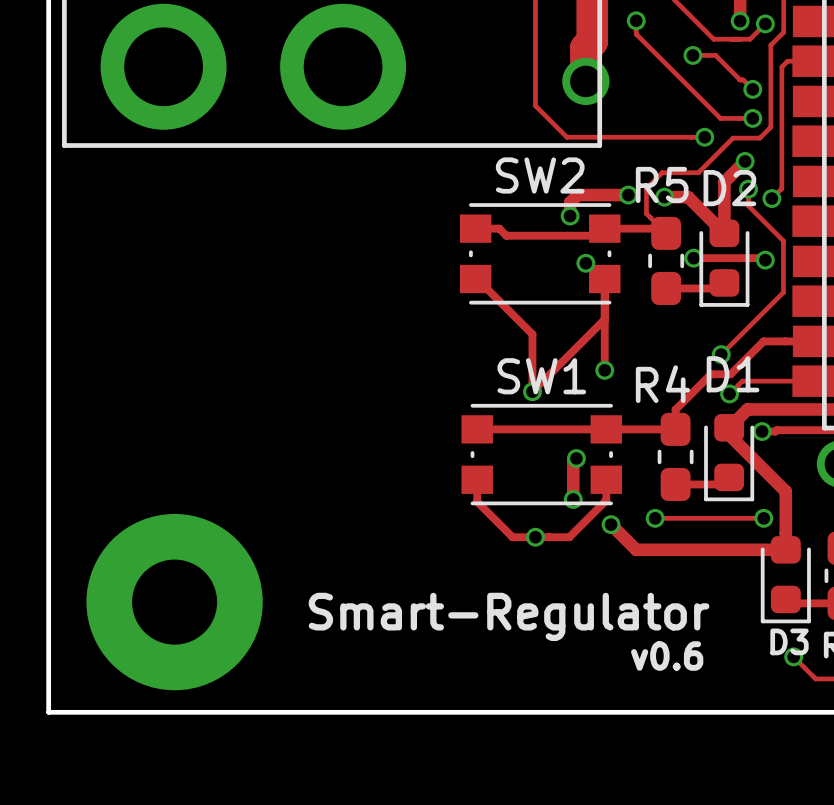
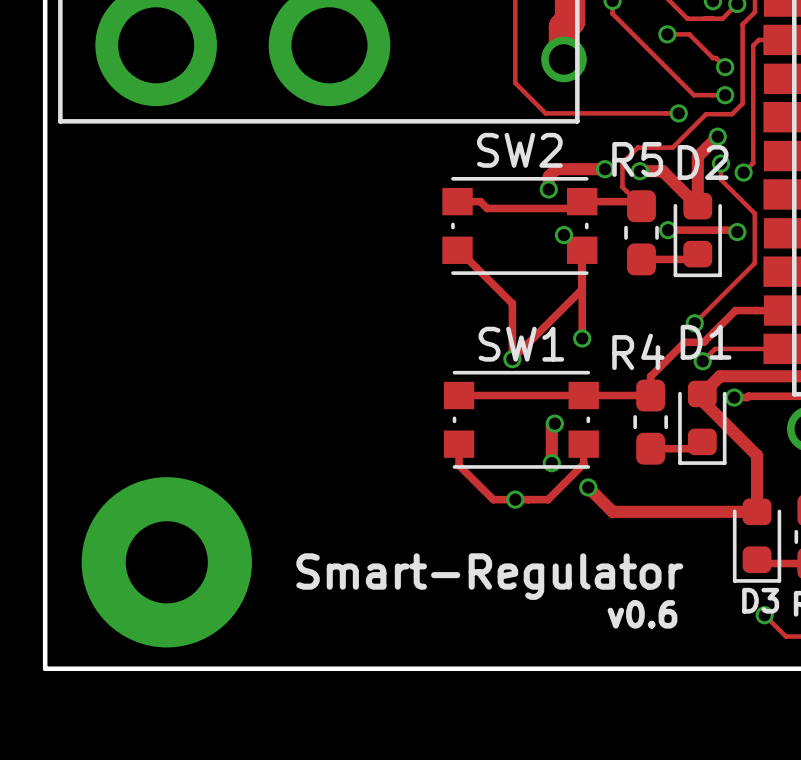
track: (655, 518) (763, 518) -> none
via: (655, 518) -> none
via: (763, 518) -> none

